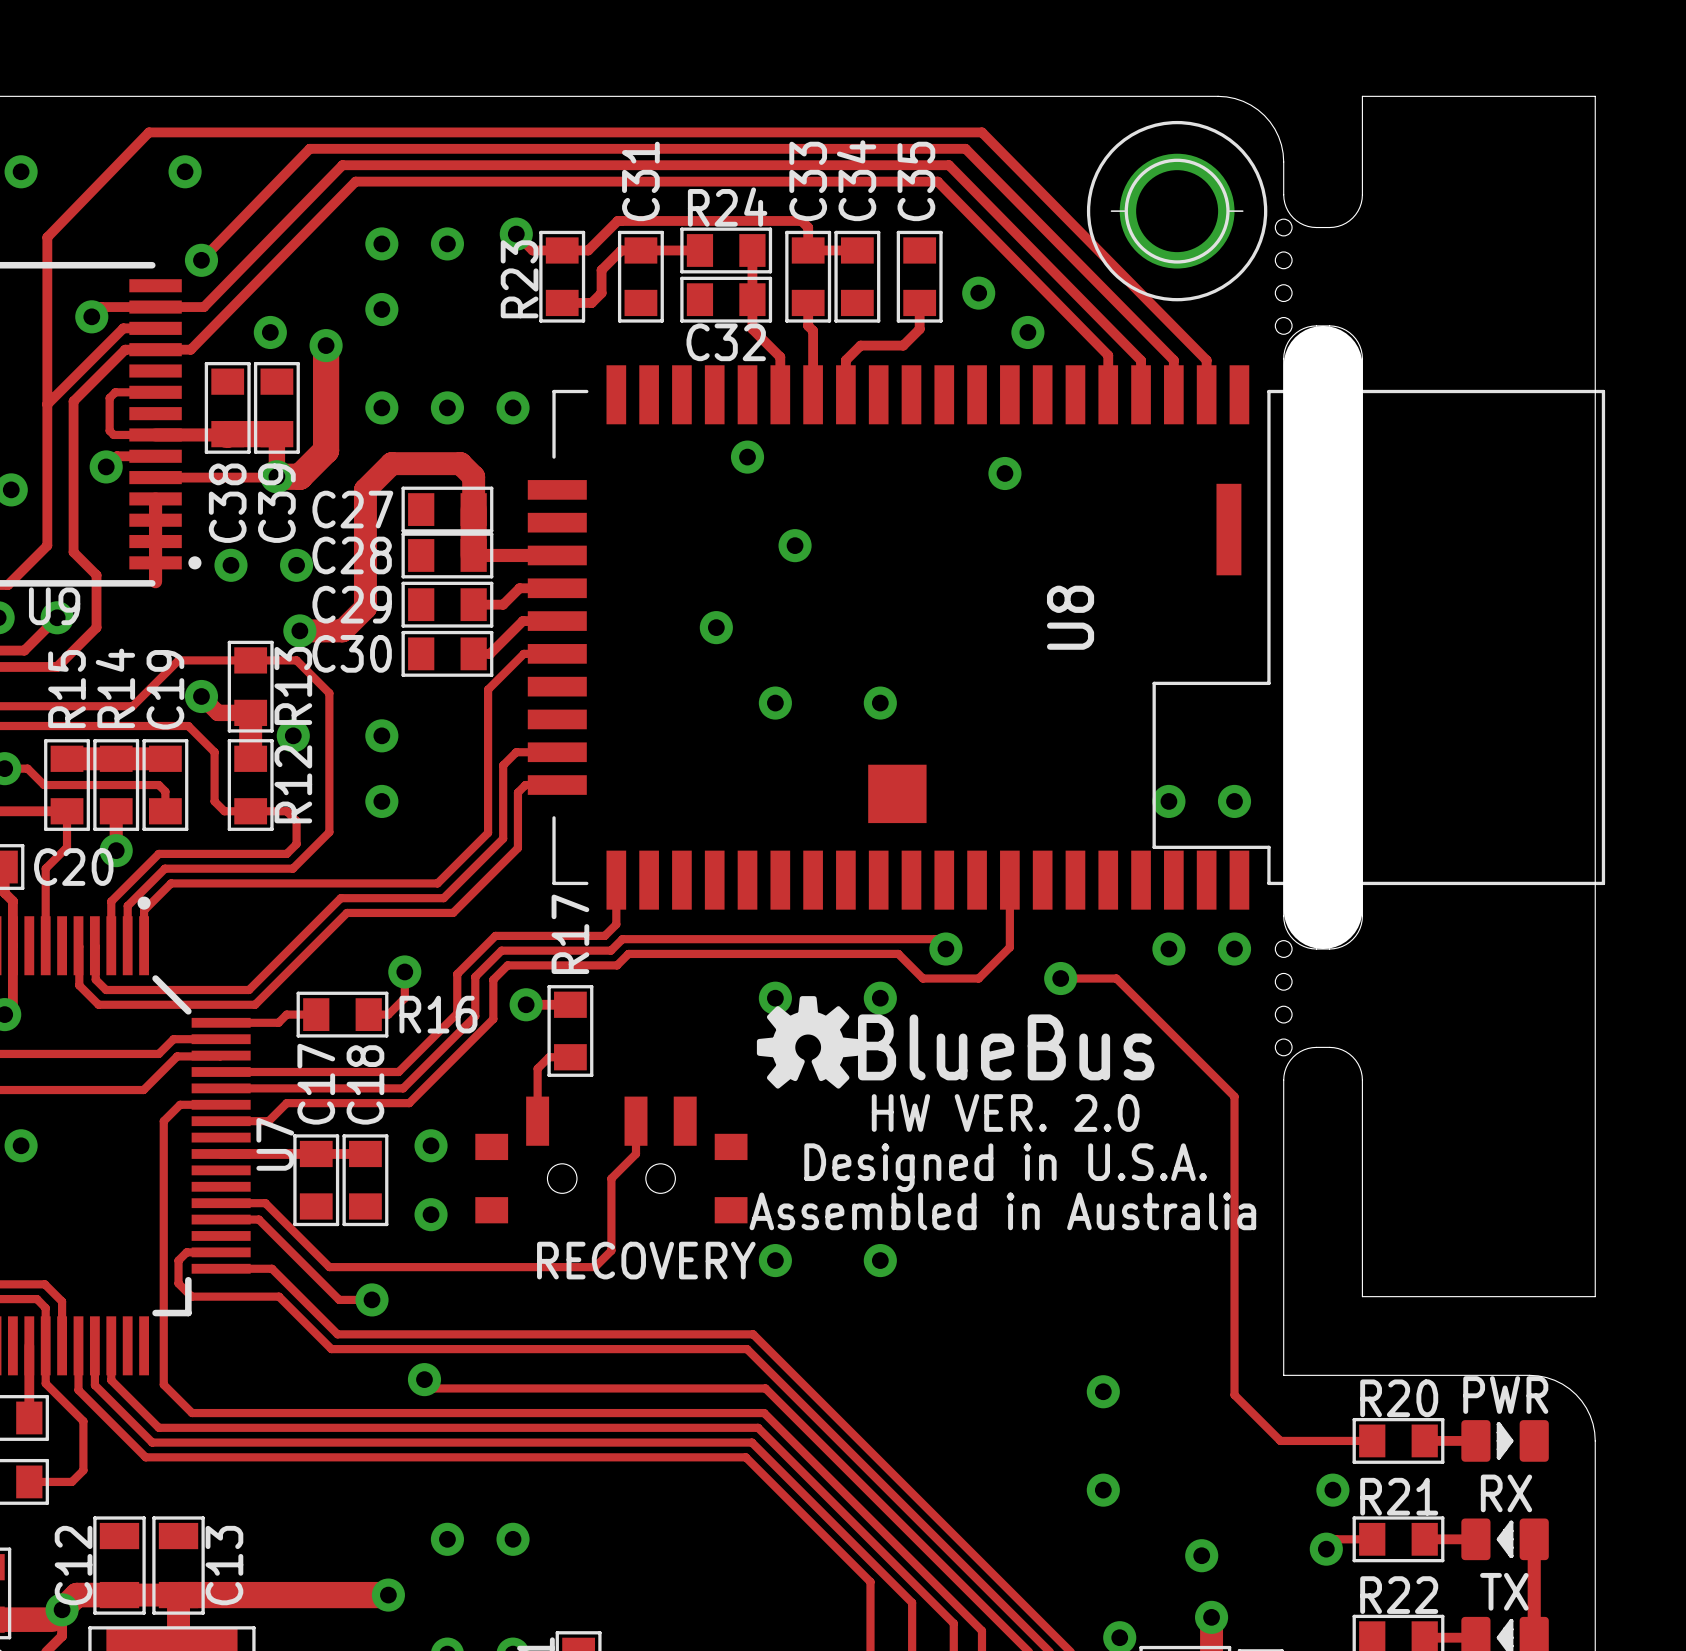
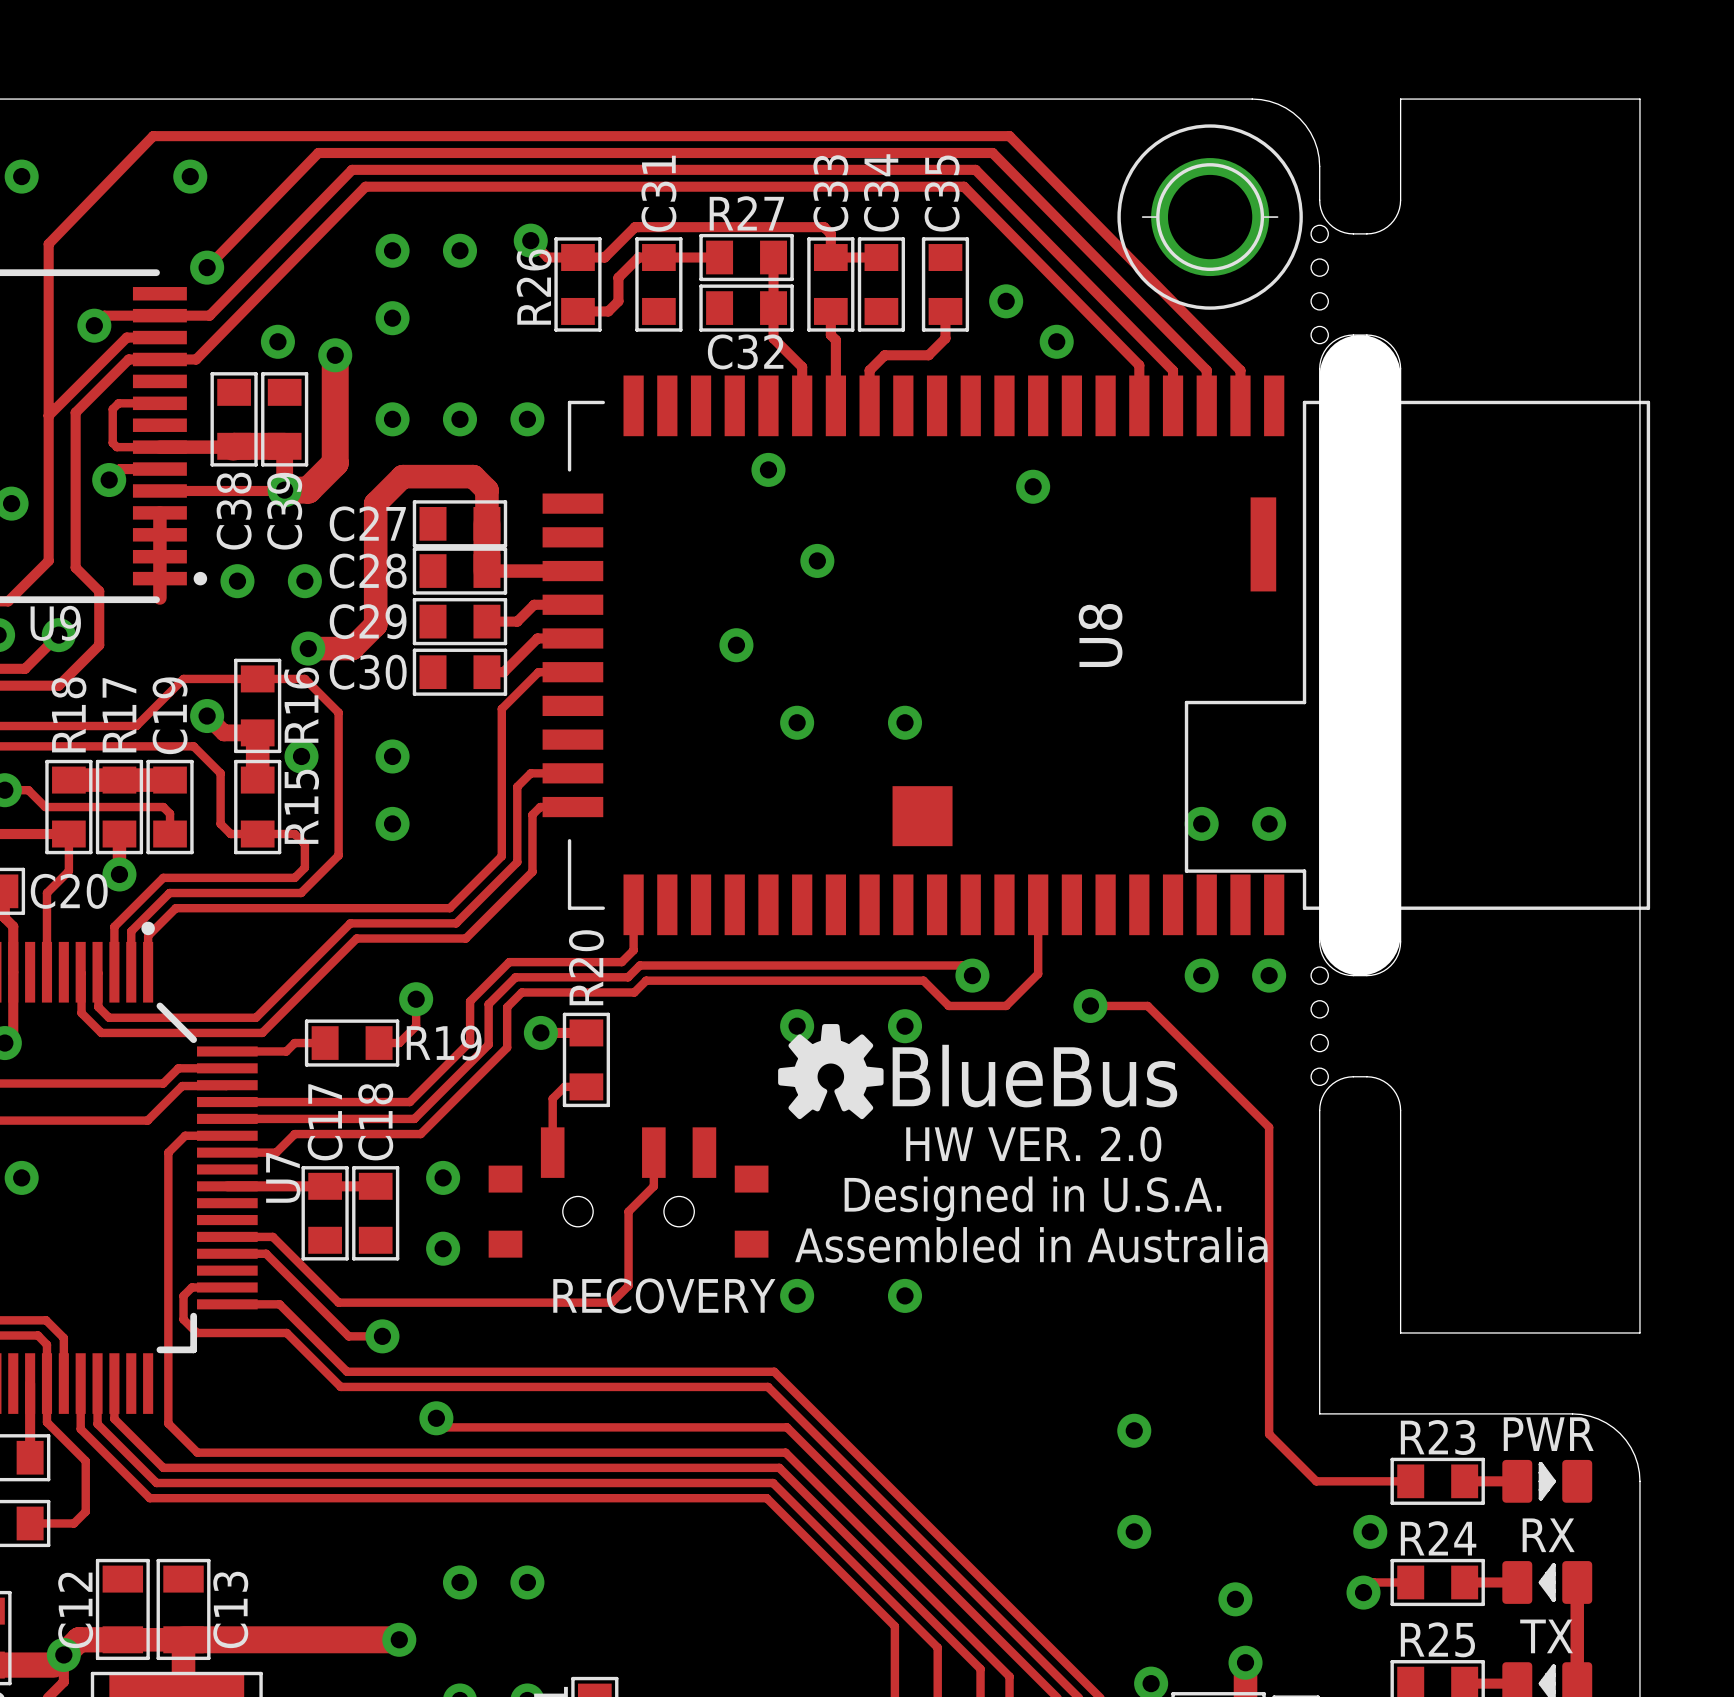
R24 name: R24 (727, 207) -> R27 (746, 213)
R23 name: R23 (519, 279) -> R26 (534, 287)
R13 name: R13 (293, 685) -> R16 (301, 705)
R14 name: R14 (115, 688) -> R17 (119, 715)
R15 name: R15 (67, 689) -> R18 (68, 714)
R12 name: R12 (293, 784) -> R15 (301, 806)
R17 name: R17 (570, 934) -> R20 (586, 967)
R16 name: R16 (438, 1014) -> R19 (444, 1043)
R20 name: R20 (1399, 1398) -> R23 (1438, 1437)
R21 name: R21 (1399, 1496) -> R24 (1438, 1538)
R22 name: R22 (1399, 1595) -> R25 (1437, 1639)

